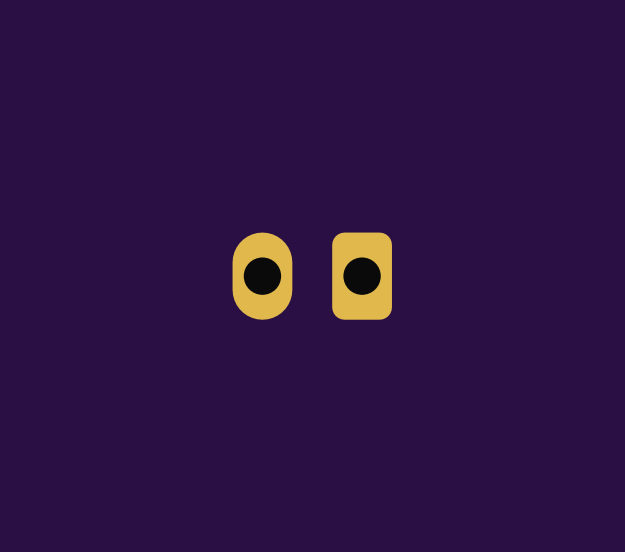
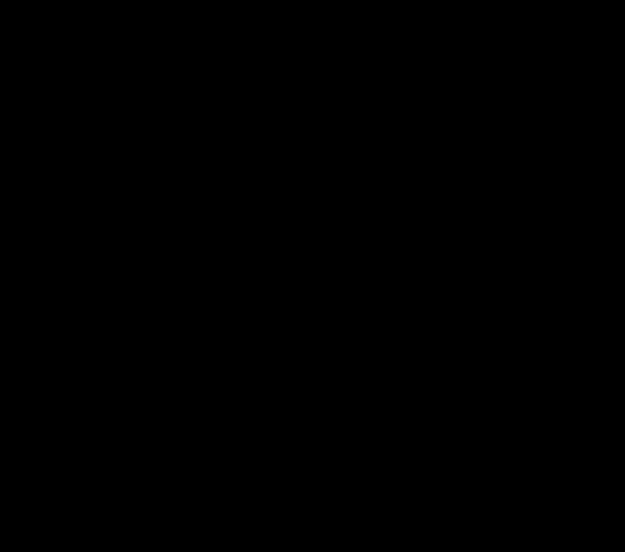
part: (312, 276) -> none

